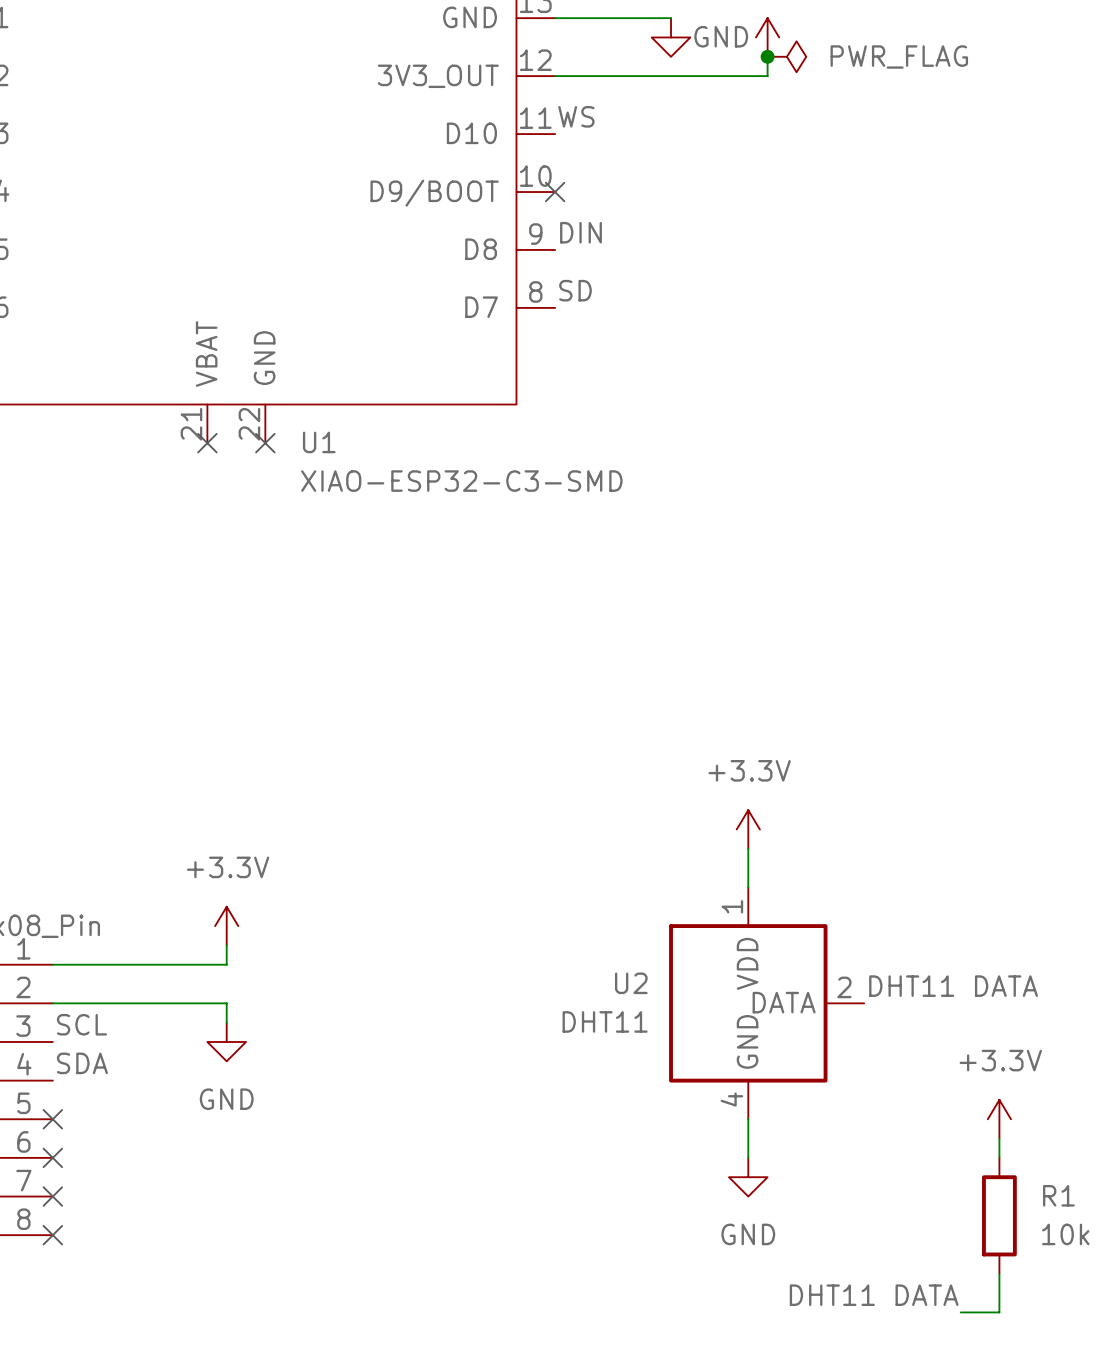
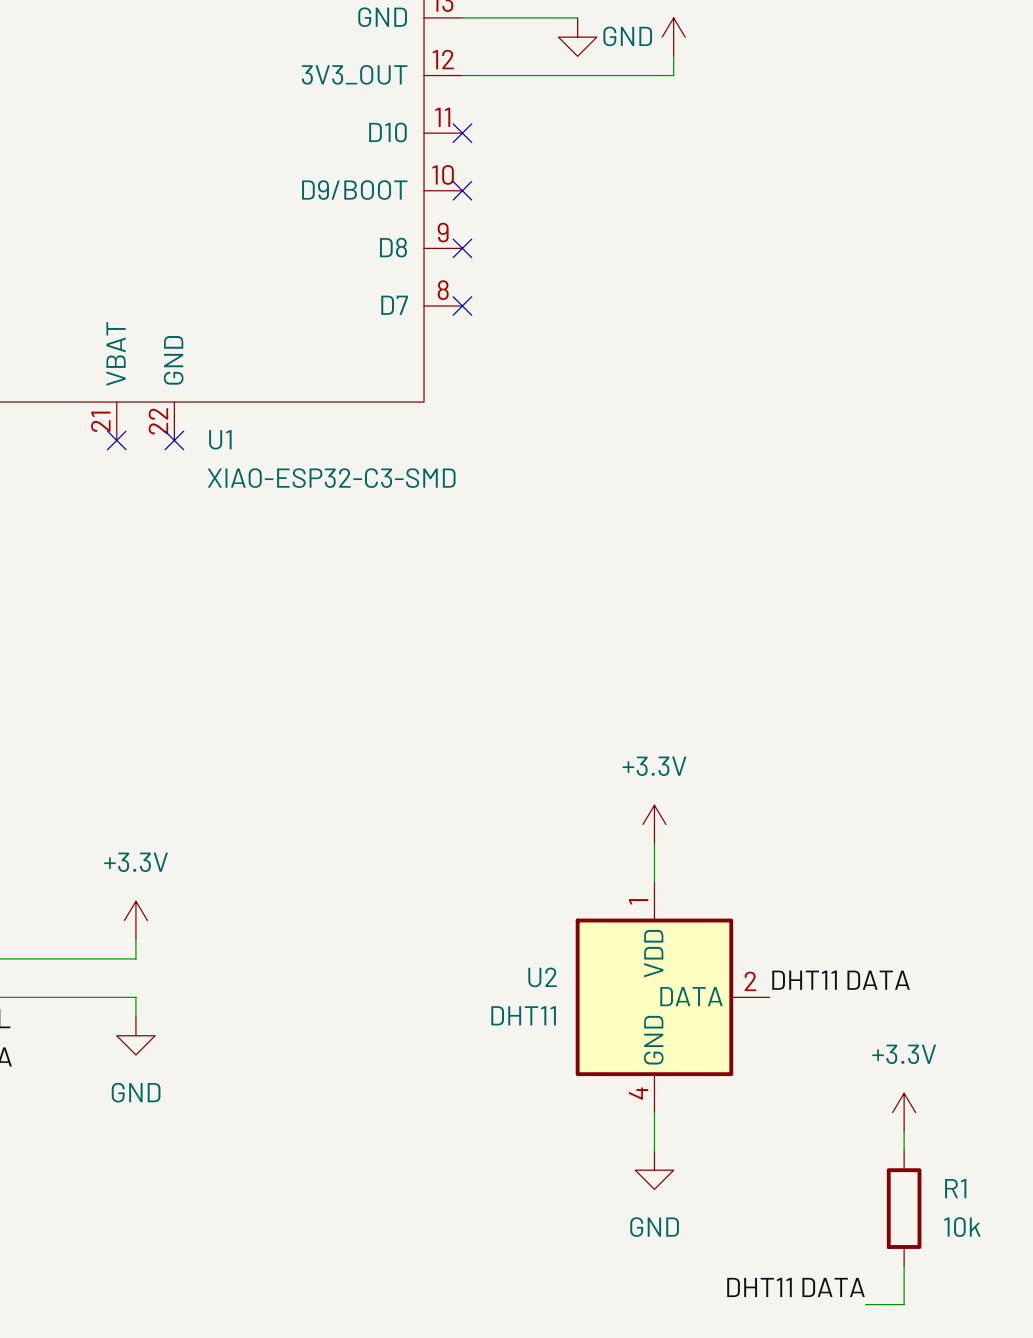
junction: (767, 56) -> none
power symbol: PWR_FLAG (786, 56) -> none
label: WS (576, 116) -> none
no-connect mark: none -> (462, 133)
label: DIN (581, 232) -> none
no-connect mark: none -> (462, 248)
label: SD (575, 290) -> none
no-connect mark: none -> (462, 305)

